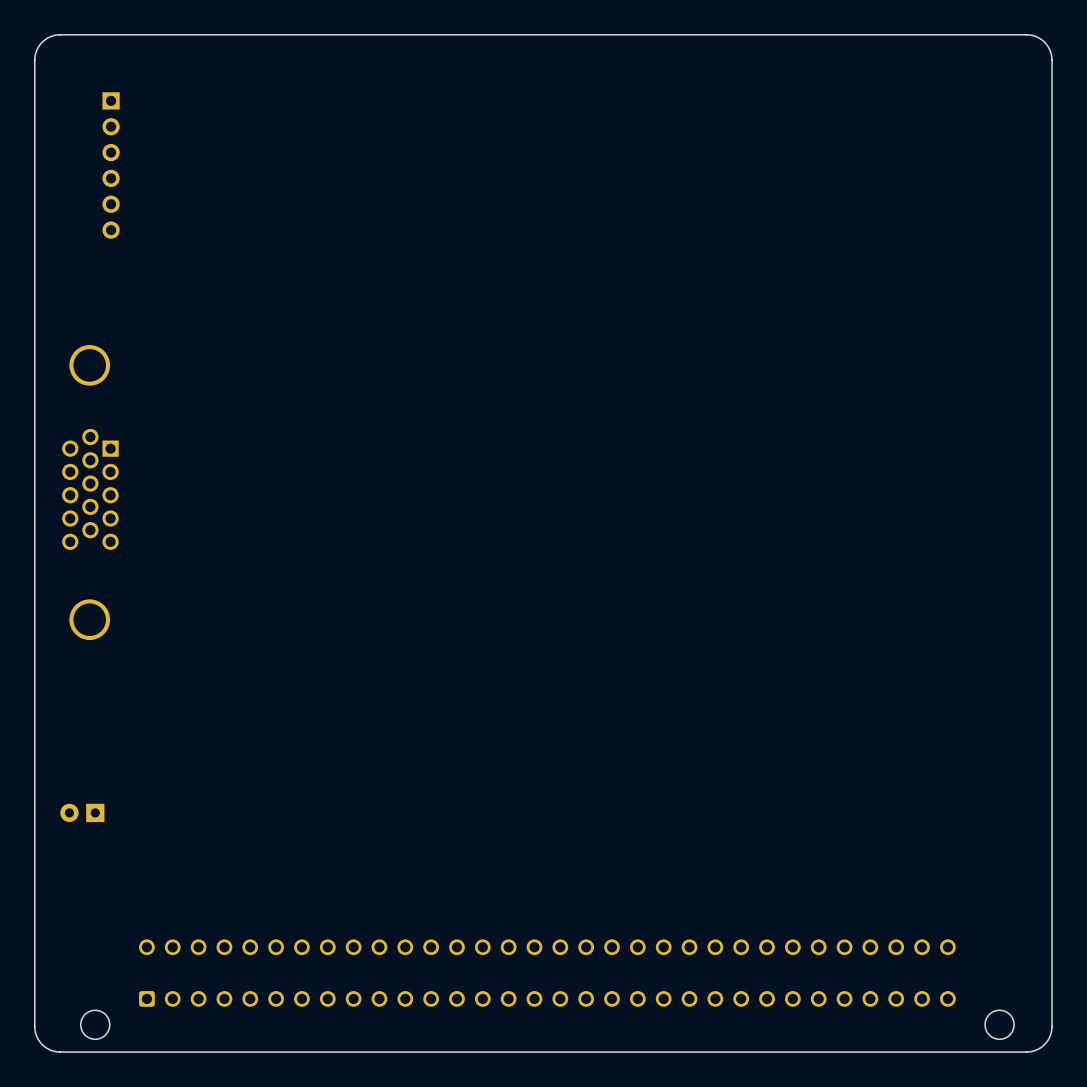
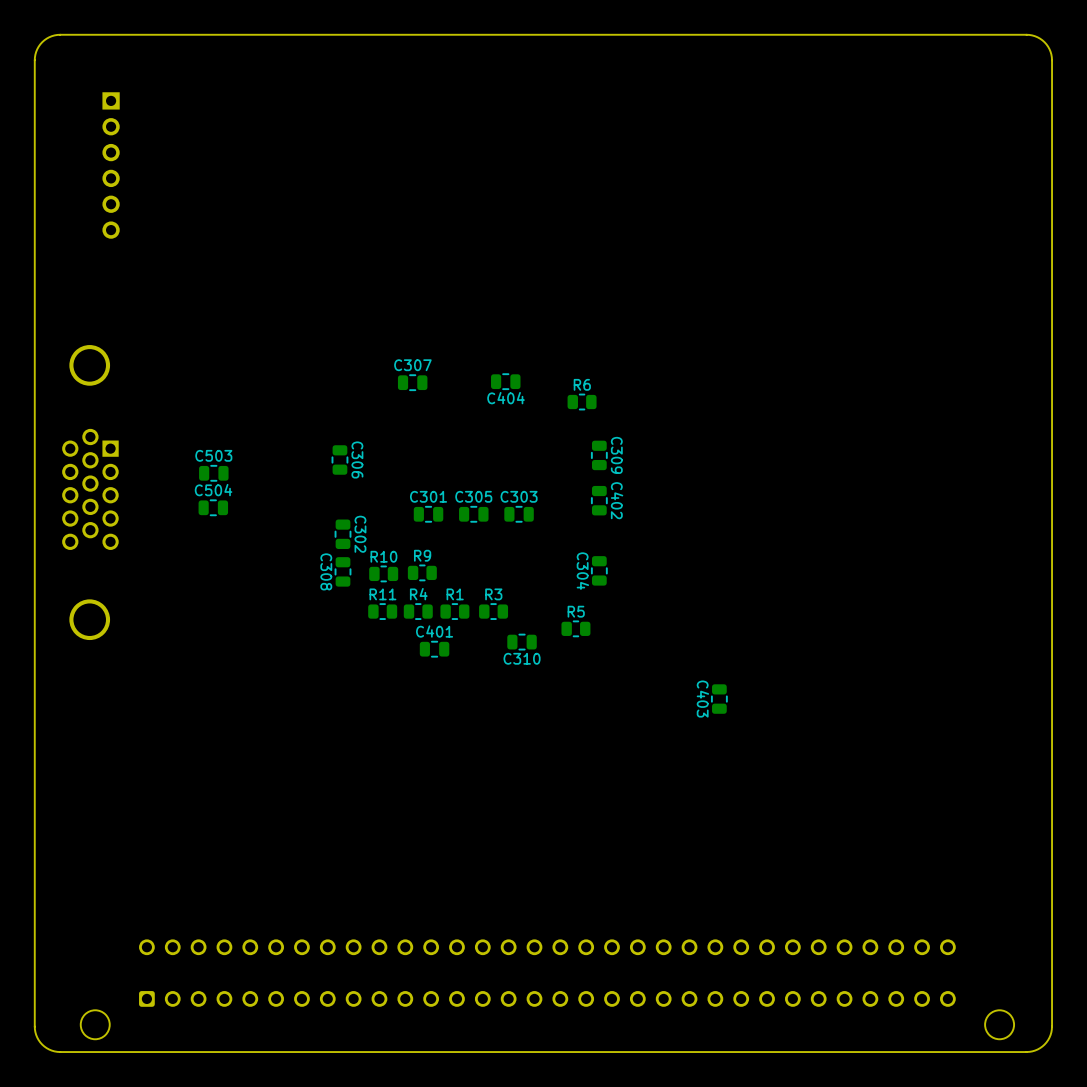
C404: none -> (505, 381)
C307: none -> (412, 382)
R6: none -> (582, 402)
C309: none -> (599, 455)
C306: none -> (339, 459)
C503: none -> (213, 473)
C402: none -> (599, 500)
C504: none -> (213, 507)
C301: none -> (428, 514)
C305: none -> (473, 514)
C303: none -> (519, 514)
C302: none -> (343, 534)
C304: none -> (599, 570)
C308: none -> (343, 571)
R9: none -> (422, 572)
R10: none -> (383, 573)
R11: none -> (382, 611)
R4: none -> (418, 611)
R1: none -> (454, 611)
R3: none -> (493, 611)
R5: none -> (575, 628)
C310: none -> (522, 642)
C401: none -> (434, 649)
C403: none -> (719, 699)
part: (82, 812) -> none

